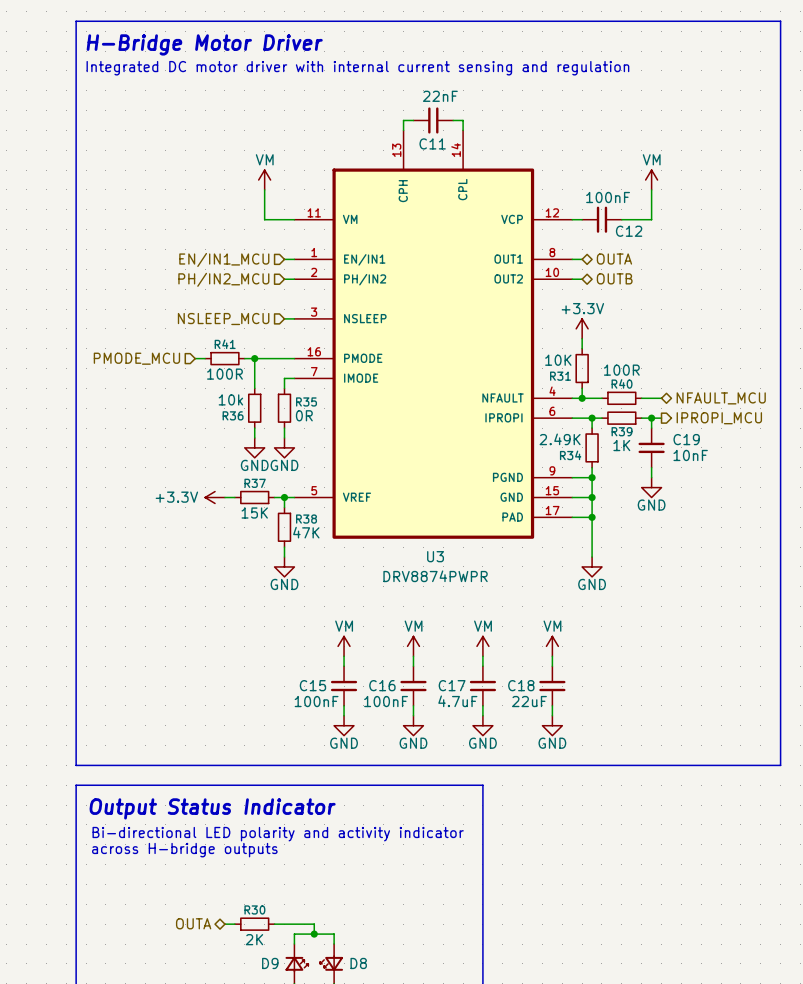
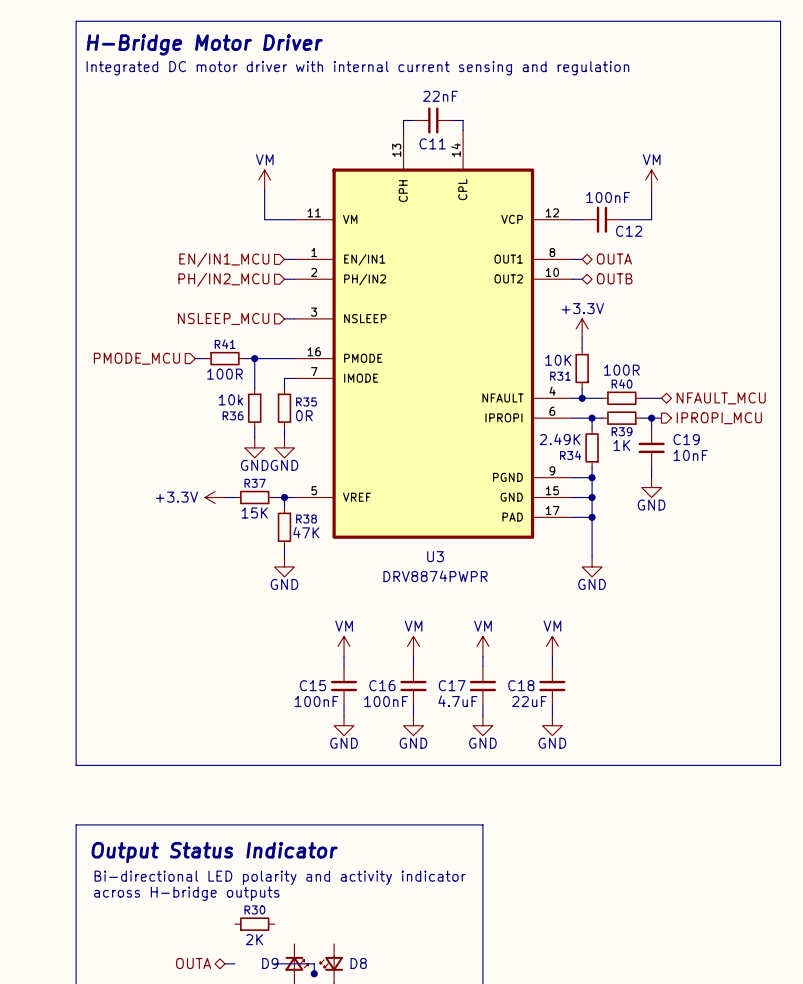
text position: Output Status Indicator (212, 808) -> Output Status Indicator (214, 852)
line: (76, 824) (76, 785) (482, 785) (482, 824) -> (76, 824) (482, 824)
text position: Bi-directional LED polarity and activity indicator (278, 834) -> Bi-directional LED polarity and activity indicator (280, 877)
text position: across H-bridge outputs (184, 850) -> across H-bridge outputs (186, 893)
hierarchical label position: OUTA (193, 923) -> OUTA (193, 963)
wire: (224, 924) (234, 924) -> (224, 963) (234, 963)
wire: (274, 924) (314, 924) (314, 934) -> (274, 963) (314, 963) (314, 973)
junction: (314, 934) -> none
wire: (294, 944) (294, 934) (334, 934) (334, 944) -> none
junction: none -> (314, 973)

